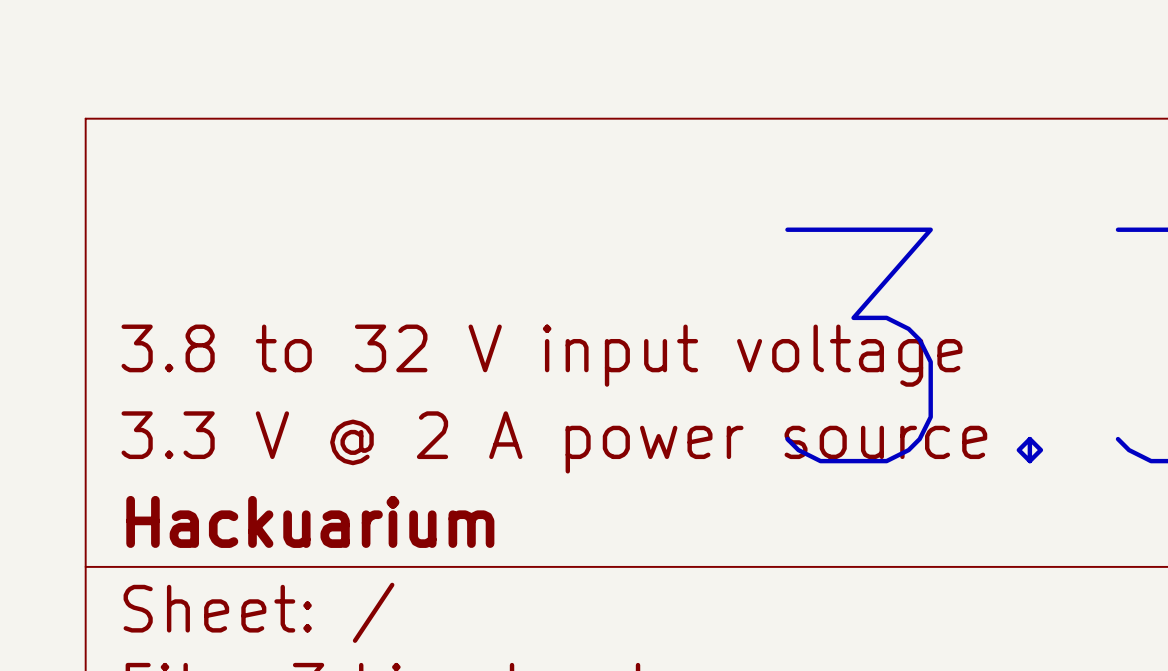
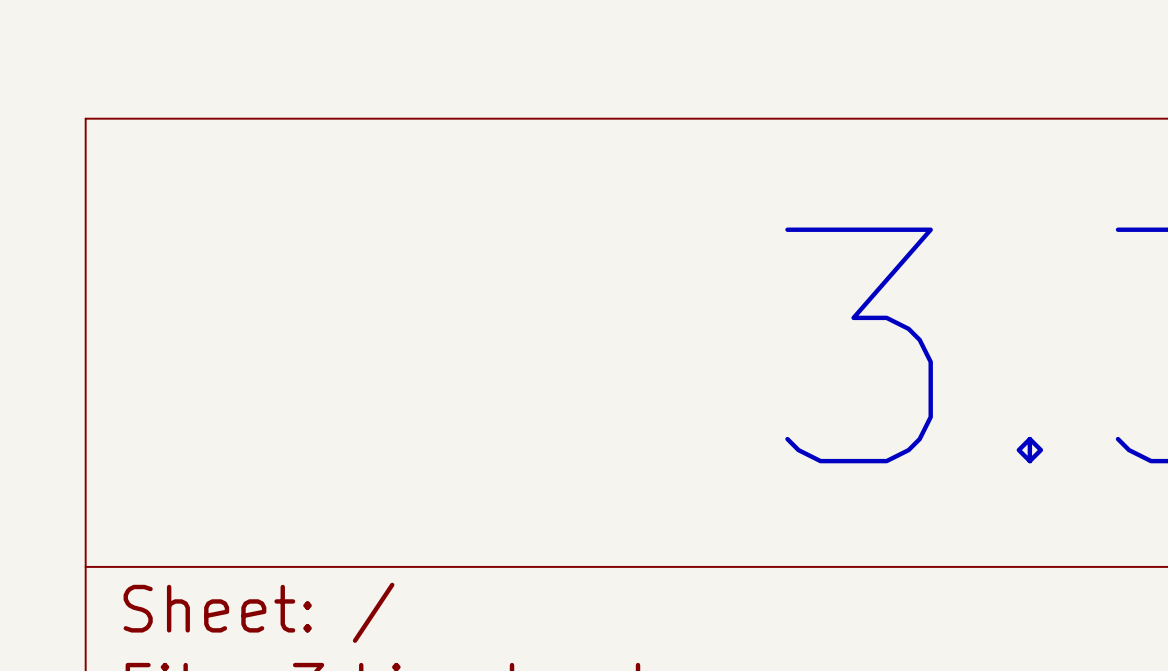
title block: 3.8 to 32 V input voltage (541, 355) -> none
title block: 3.3 V @ 2 A power source (554, 442) -> none
title block: Hackuarium (310, 521) -> none

